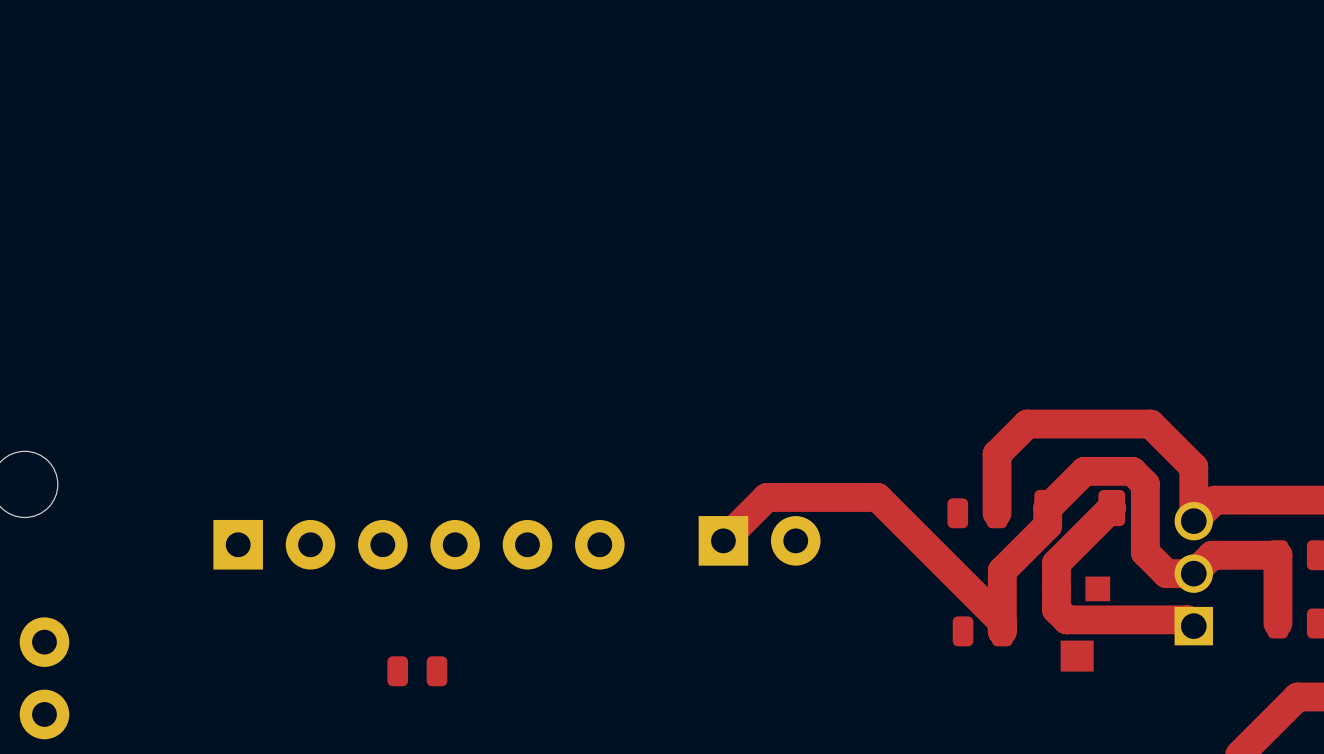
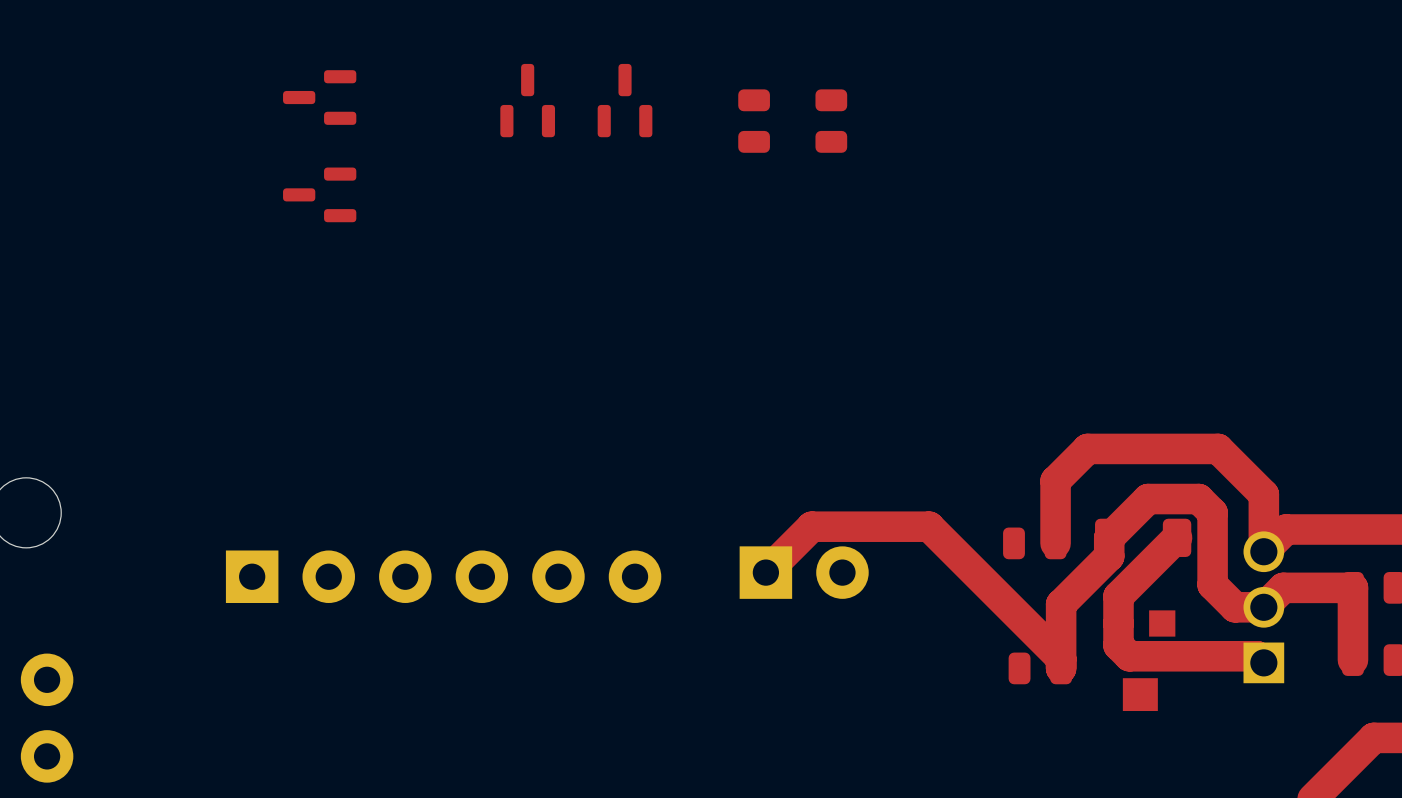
part: none -> (319, 97)
part: none -> (527, 100)
part: none -> (625, 100)
part: none -> (754, 121)
part: none -> (831, 121)
part: none -> (319, 194)
part: (417, 671) -> none

